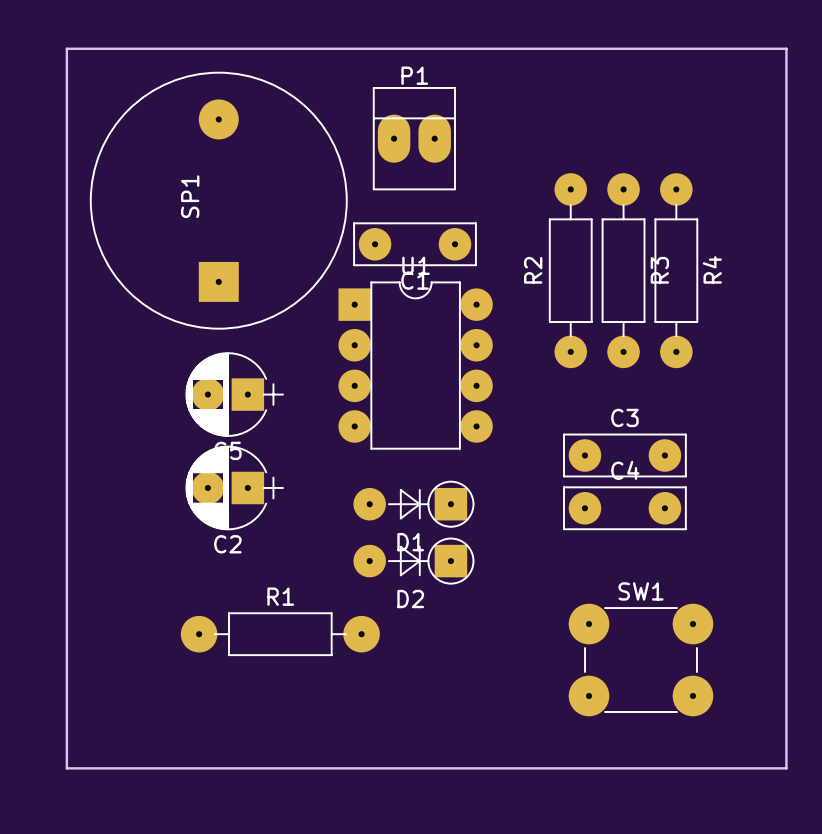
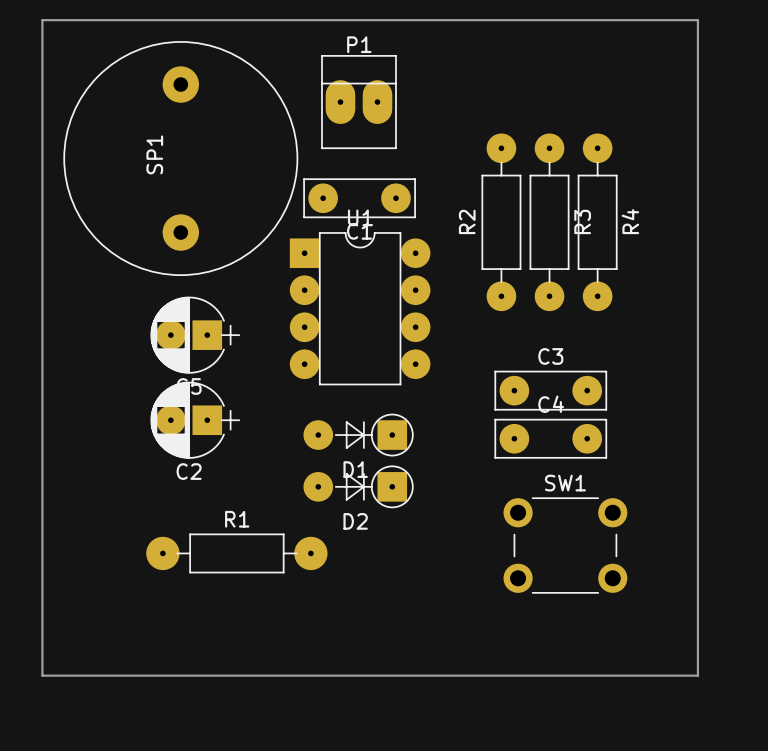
SP1 footprint: [89, 71, 348, 330] -> [63, 41, 299, 277]
SW1 footprint: [568, 603, 714, 717] -> [503, 497, 628, 594]

